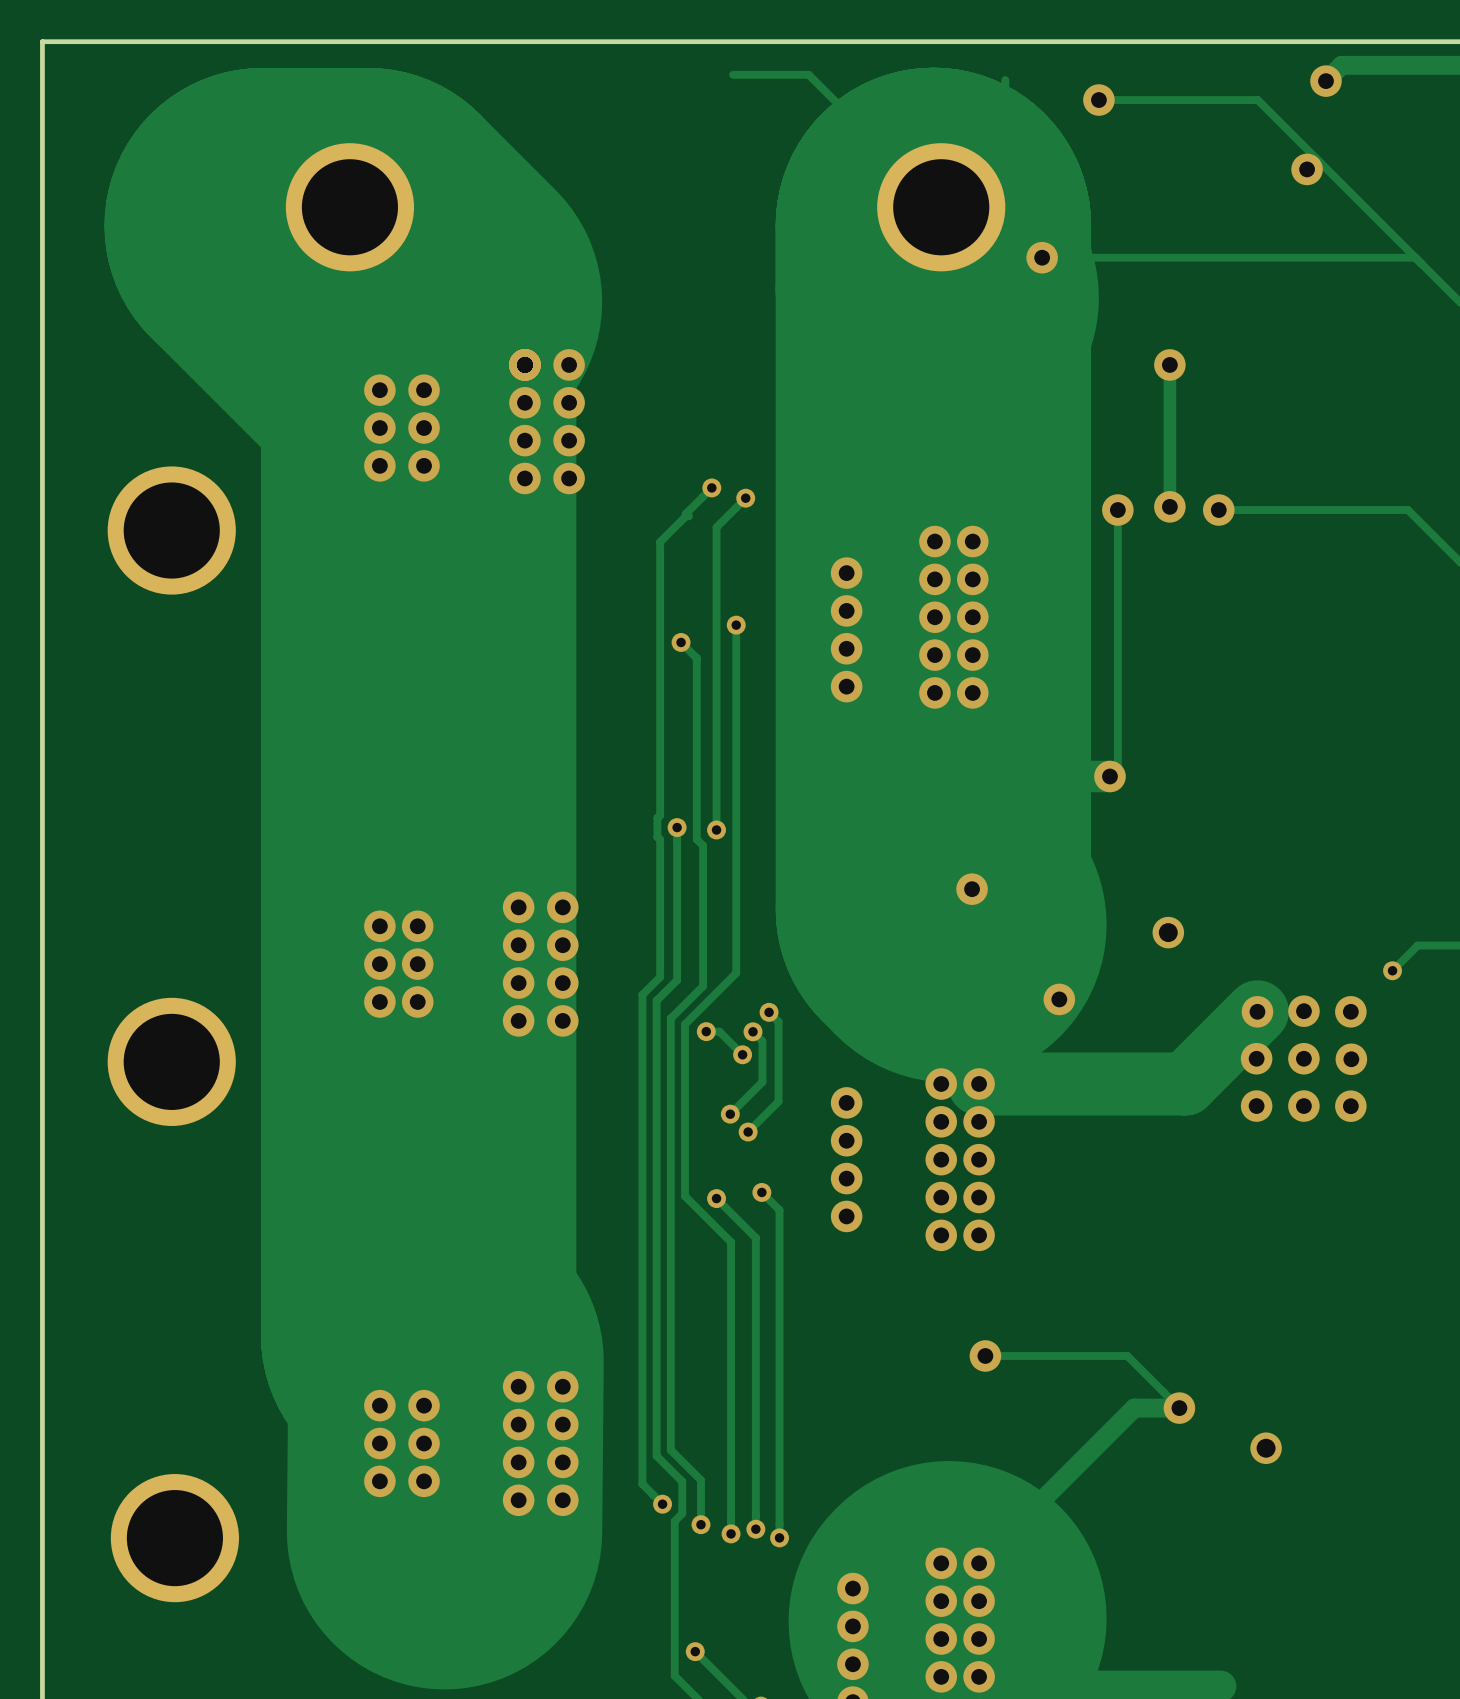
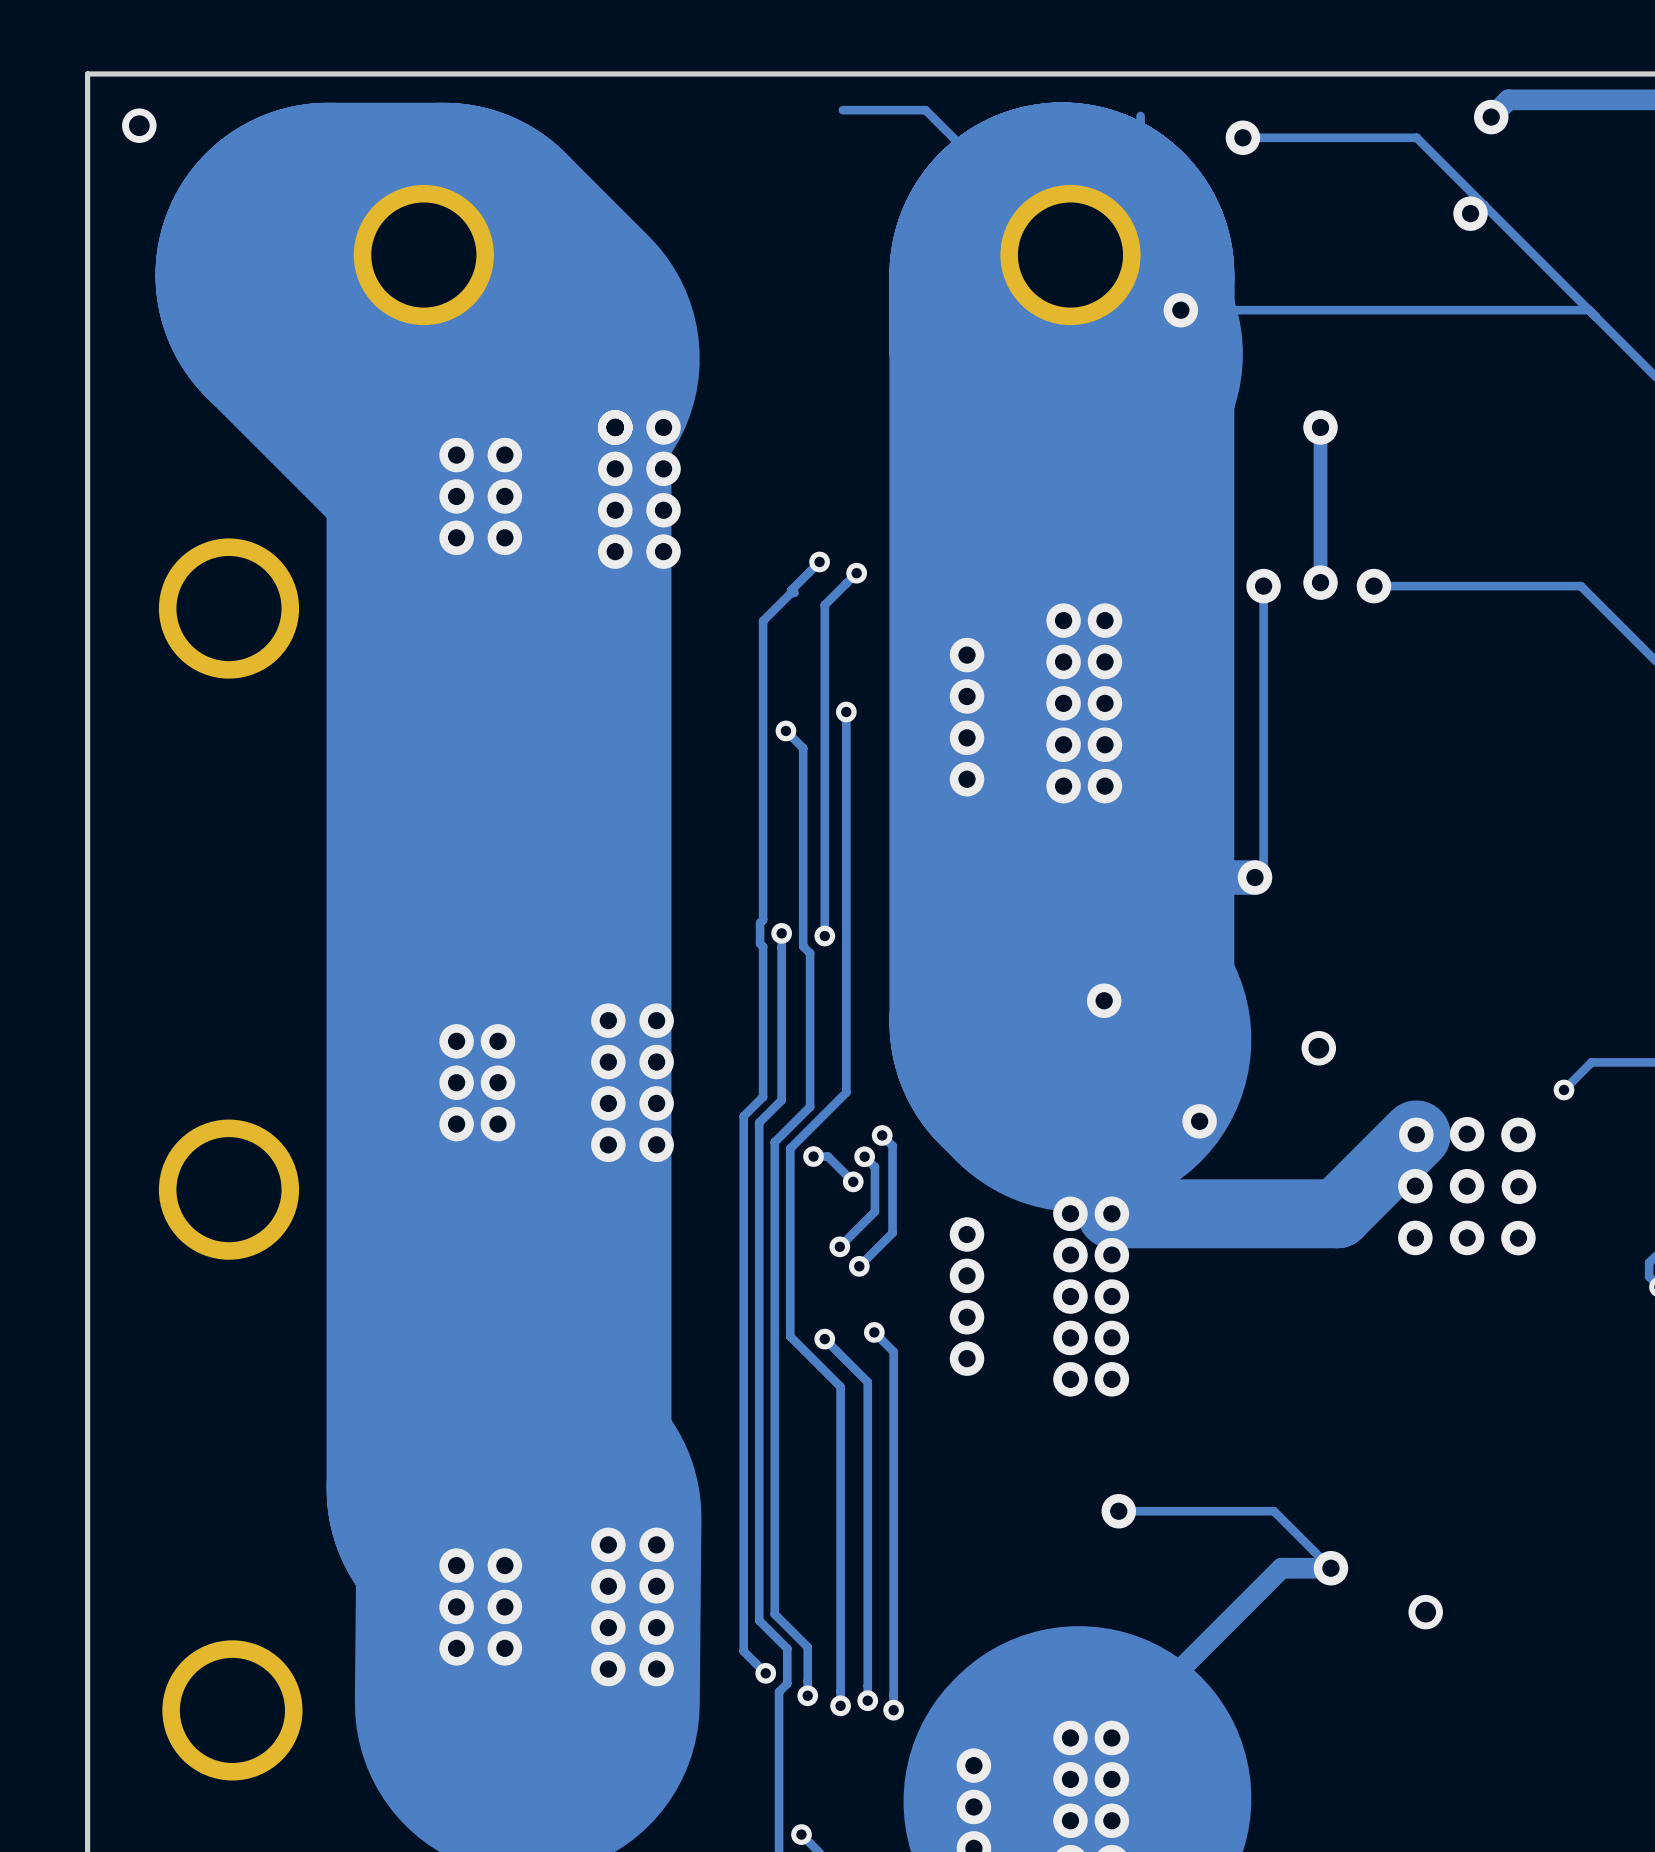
via: none -> (139, 125)

